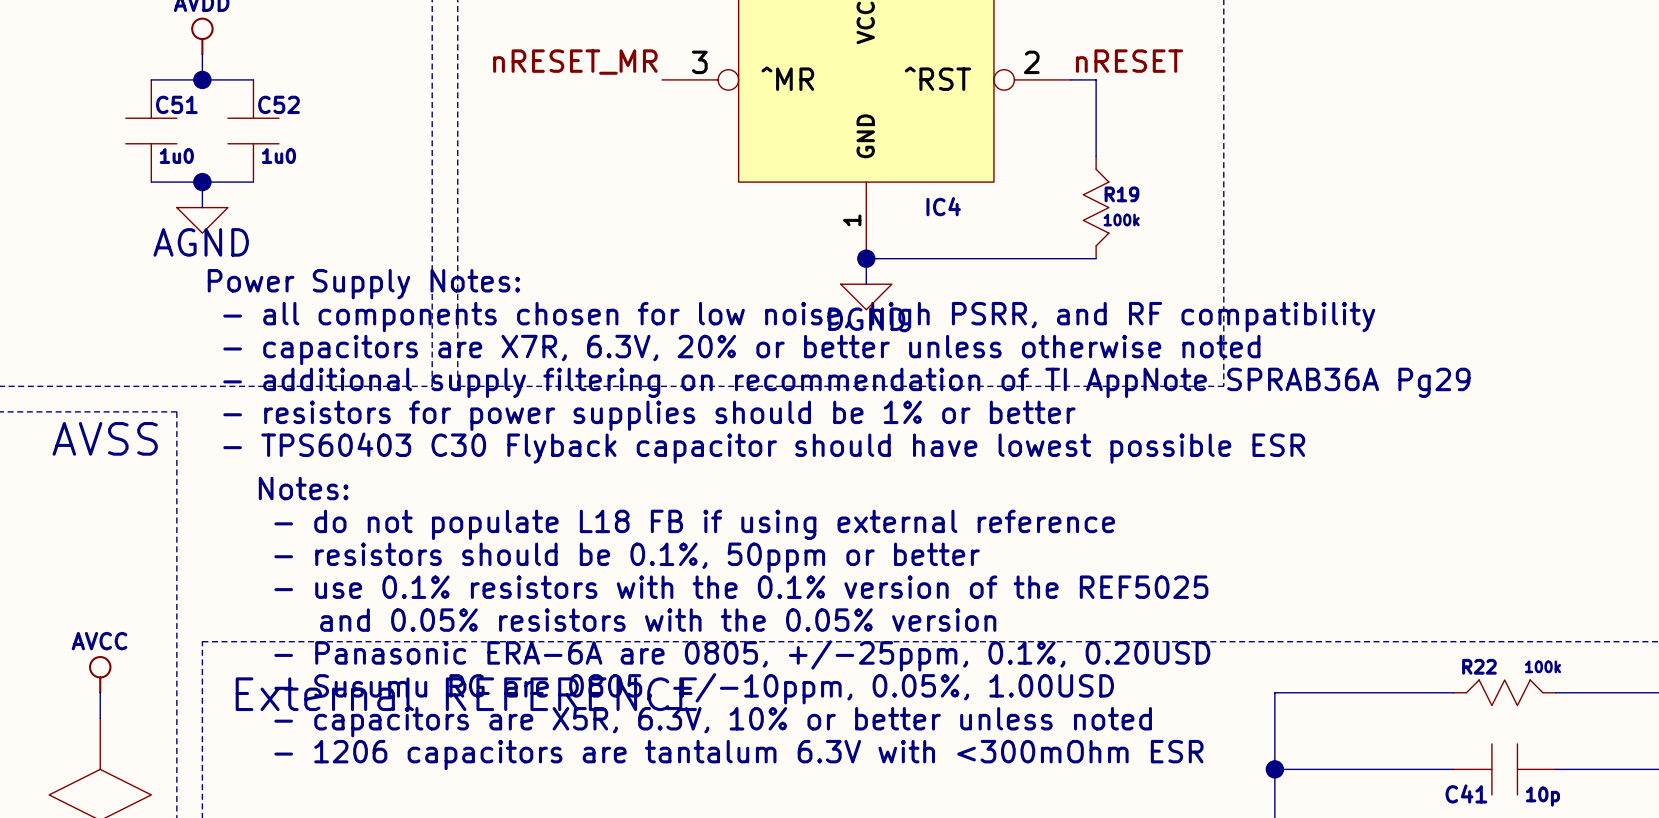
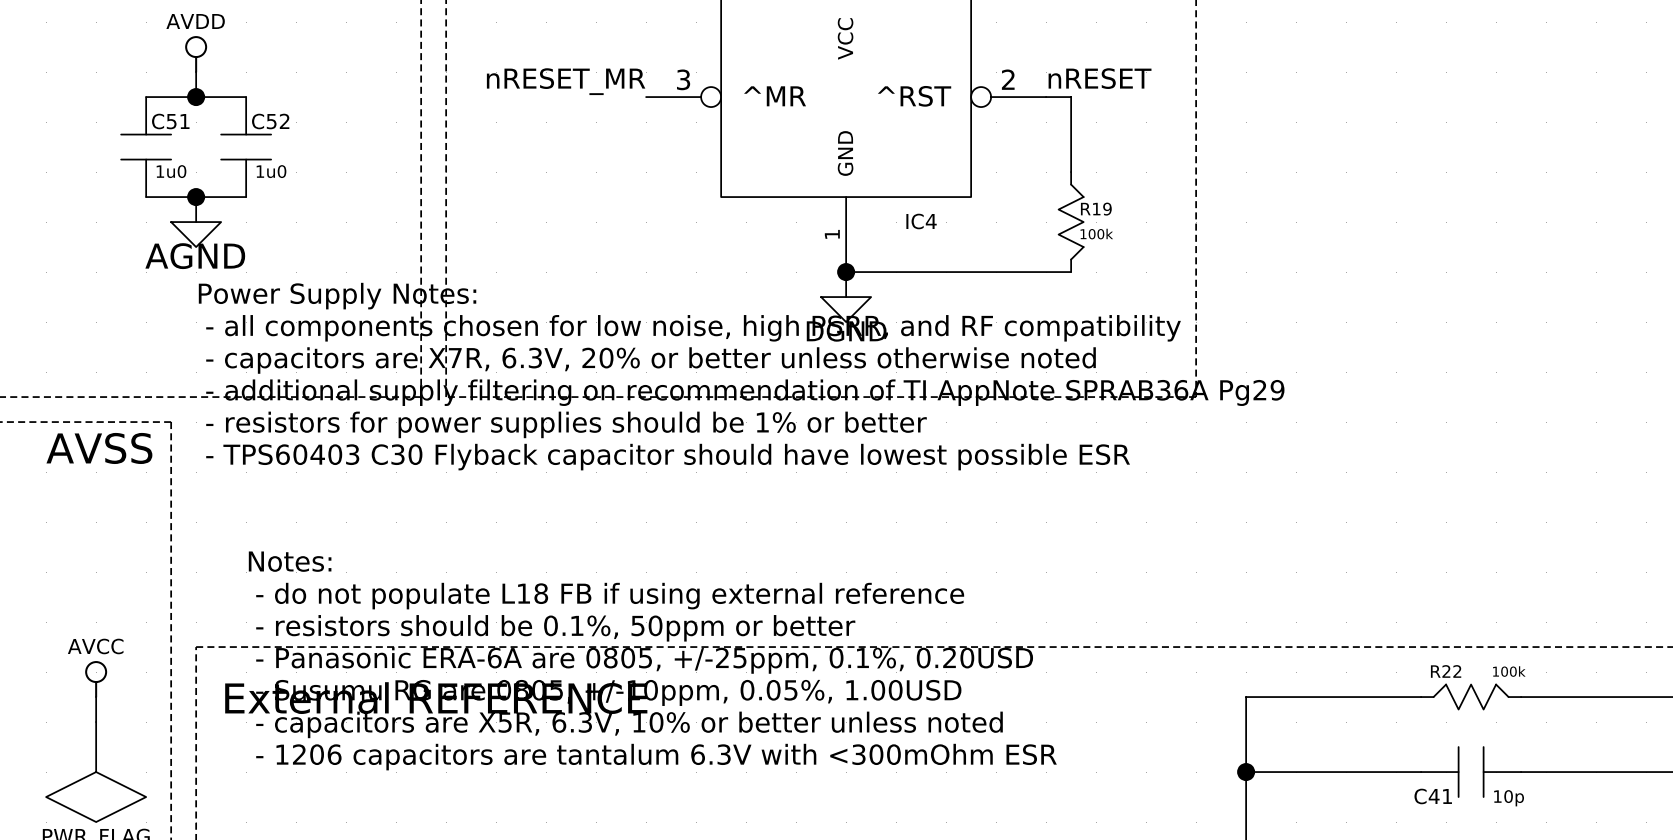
text: Notes: (303, 488) -> none
text: - do not populate L18 FB if using external reference (694, 524) -> none
text: - resistors should be 0.1%, 50ppm or better (627, 557) -> Notes: (290, 561)
text: - use 0.1% resistors with the 0.1% version of the REF5025 (741, 587) -> - do not populate L18 FB if using external reference (610, 596)
text: and 0.05% resistors with the 0.05% version (658, 620) -> - resistors should be 0.1%, 50ppm or better (555, 628)

